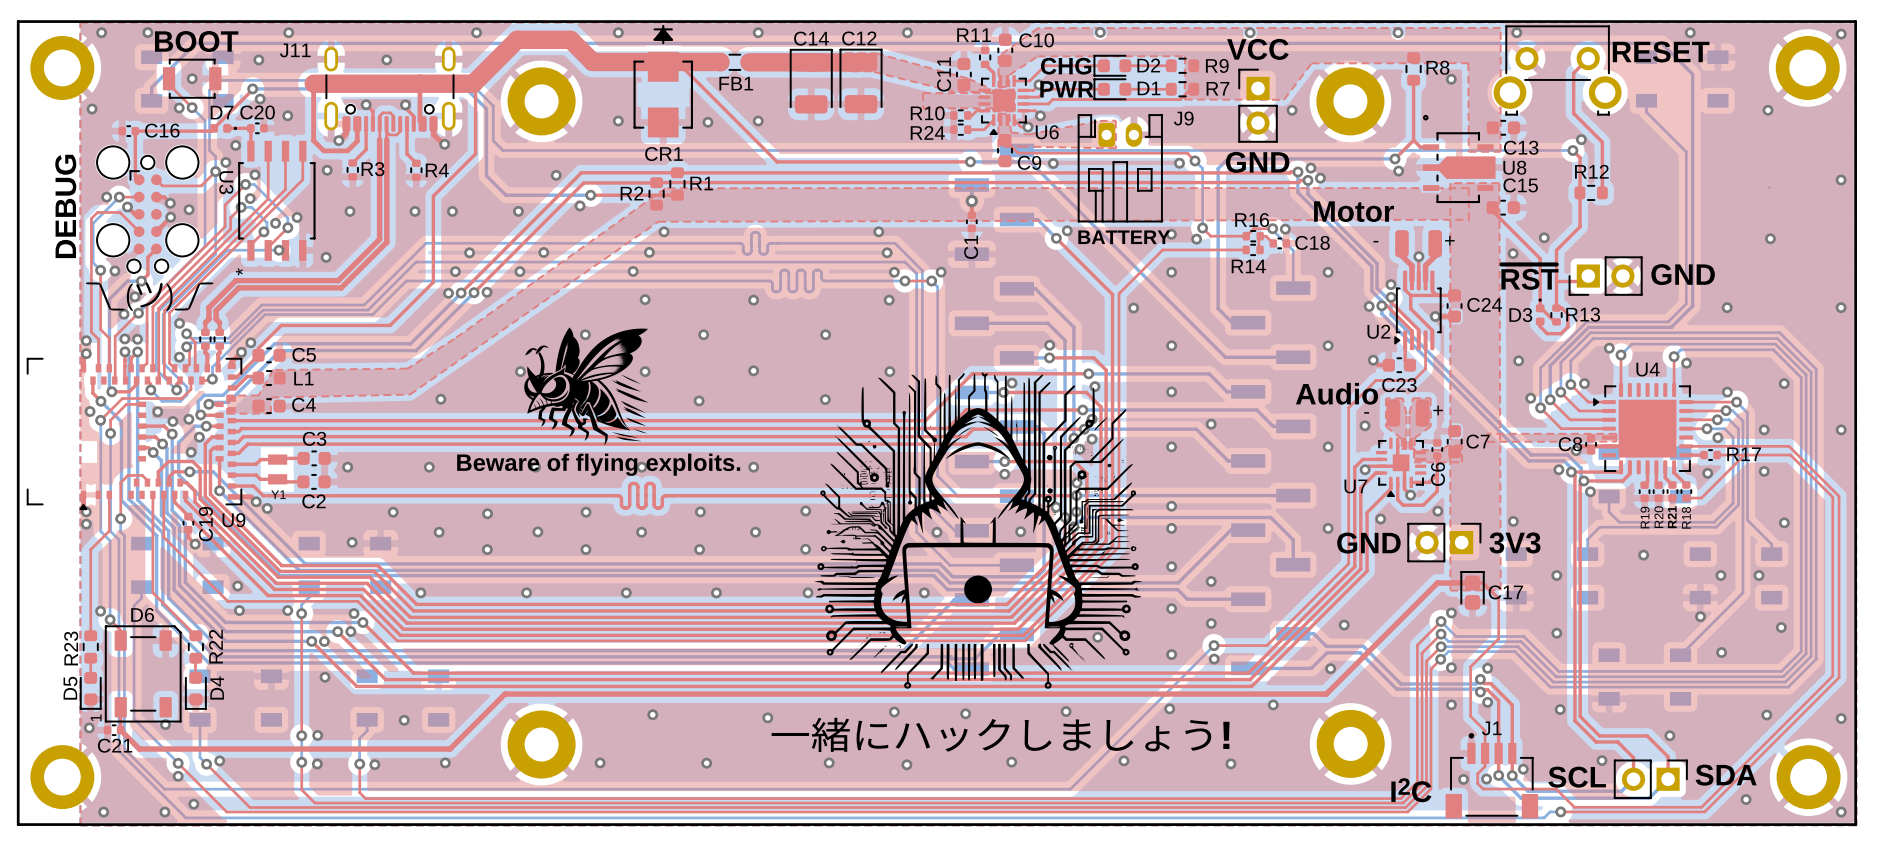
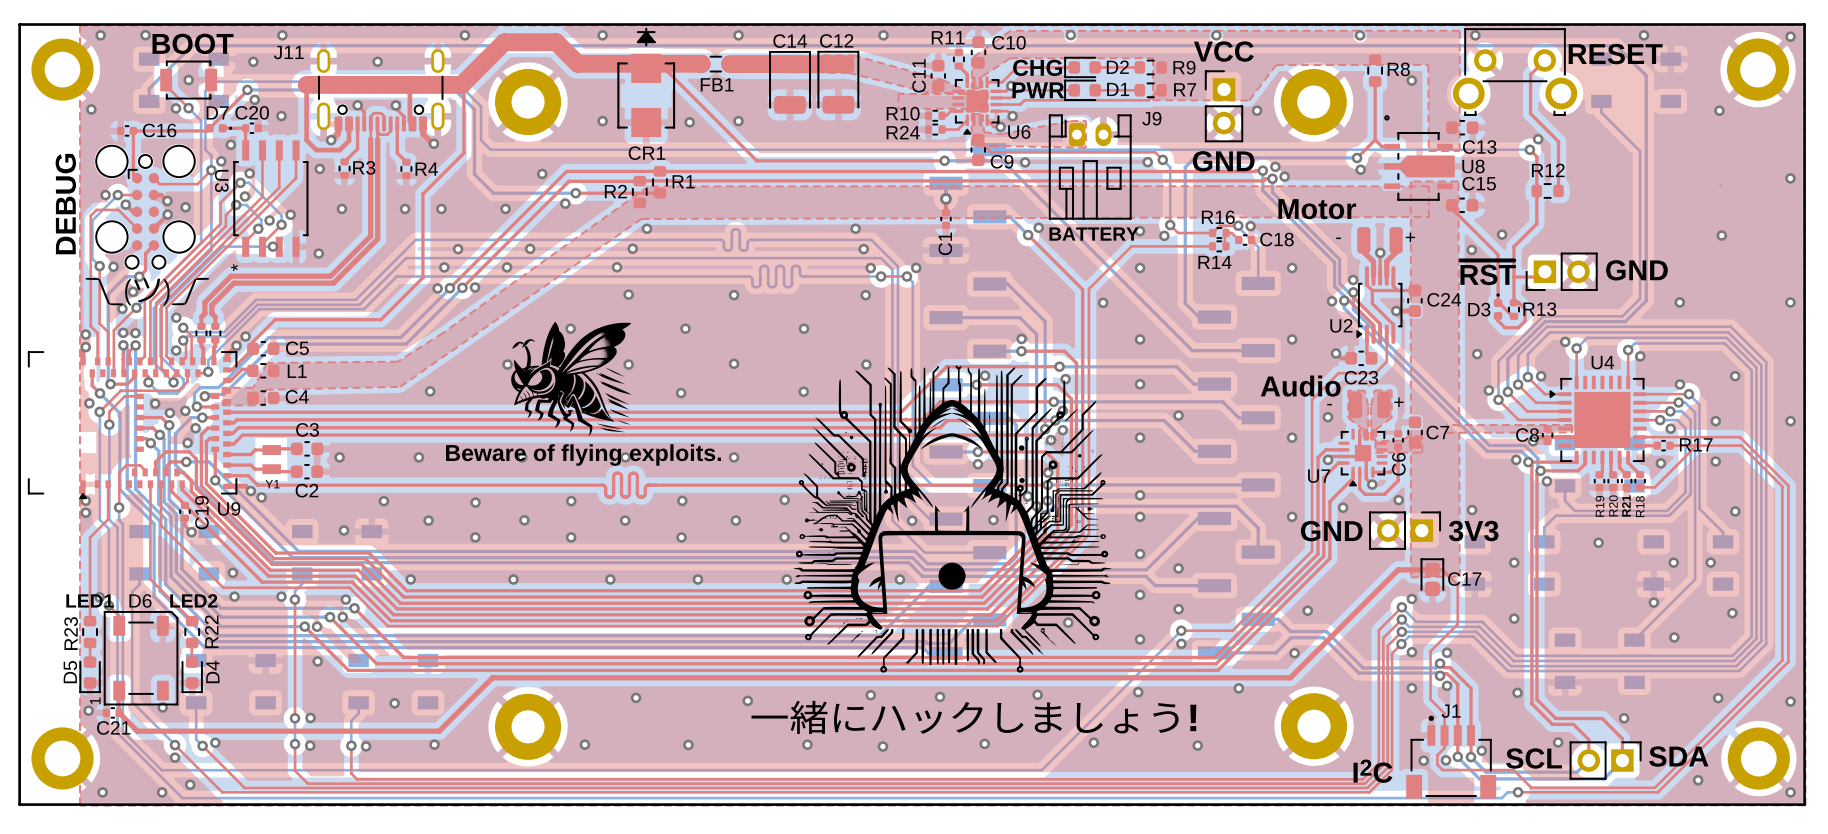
text: none -> LED1 (90, 600)
text: none -> LED2 (193, 600)

